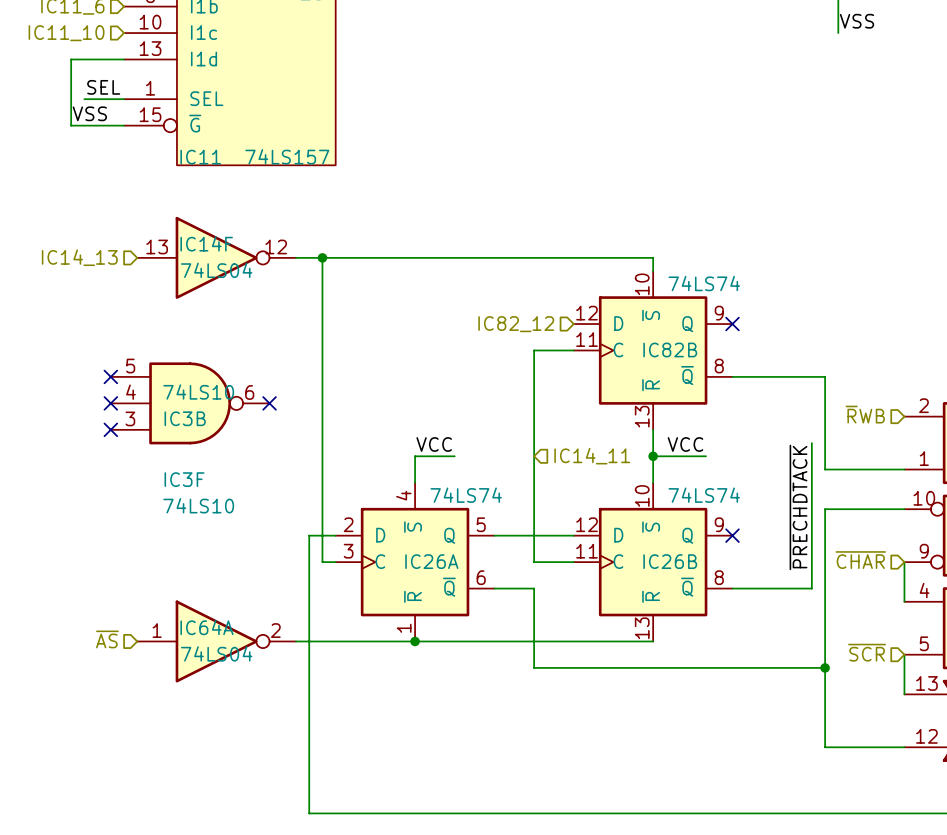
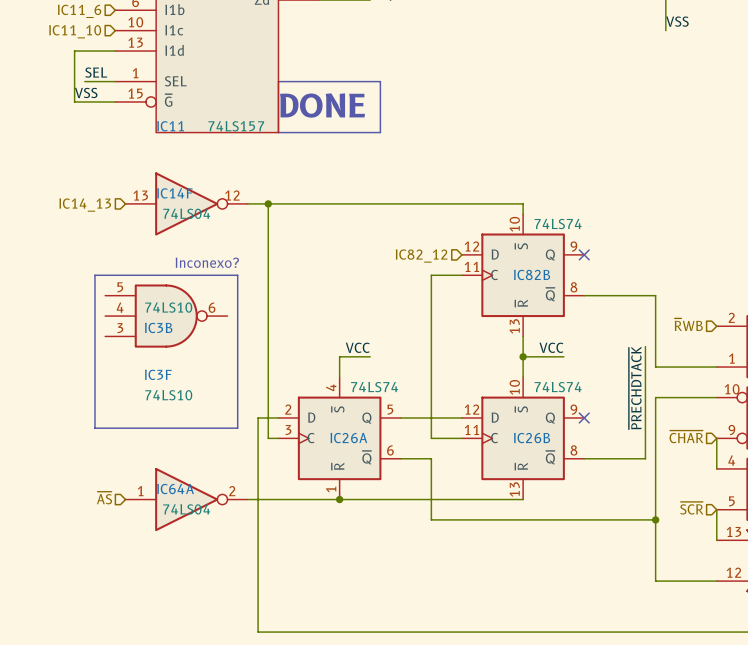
line: none -> (278, 81) (380, 81) (380, 132) (278, 132) (278, 81)
text: none -> DONE (322, 105)
text: none -> Inconexo? (207, 262)
line: none -> (94, 275) (237, 275) (237, 428) (94, 428) (94, 275)
no-connect mark: (110, 376) -> none
no-connect mark: (110, 403) -> none
no-connect mark: (269, 403) -> none
no-connect mark: (110, 429) -> none
hierarchical label: IC14_11 (592, 456) -> none

